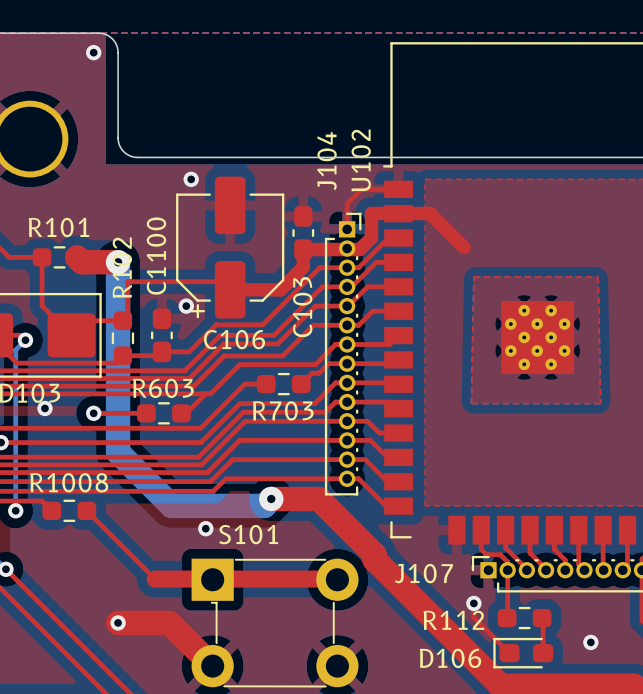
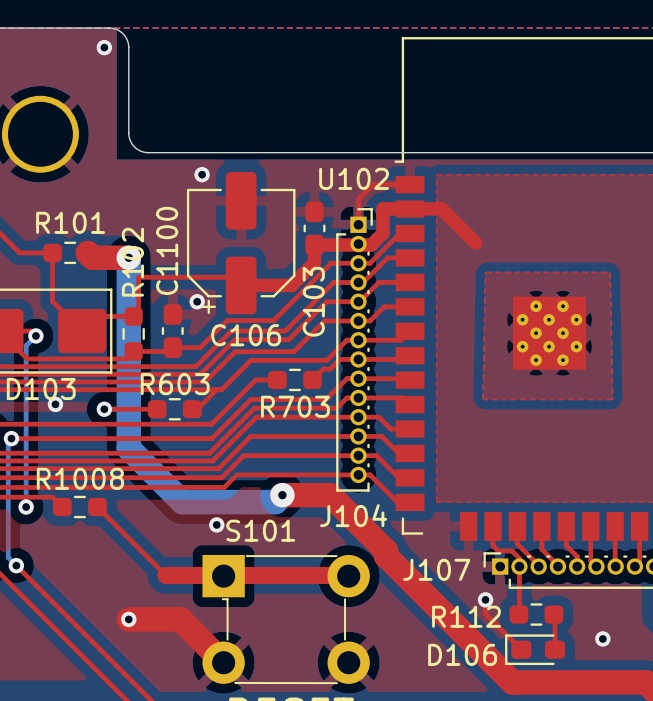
U102 name rotation: 0° (361, 160) -> 90° clockwise (354, 178)
J104 name rotation: 0° (327, 161) -> 90° clockwise (353, 515)
J104 name position: J104 (327, 161) -> J104 (353, 515)

